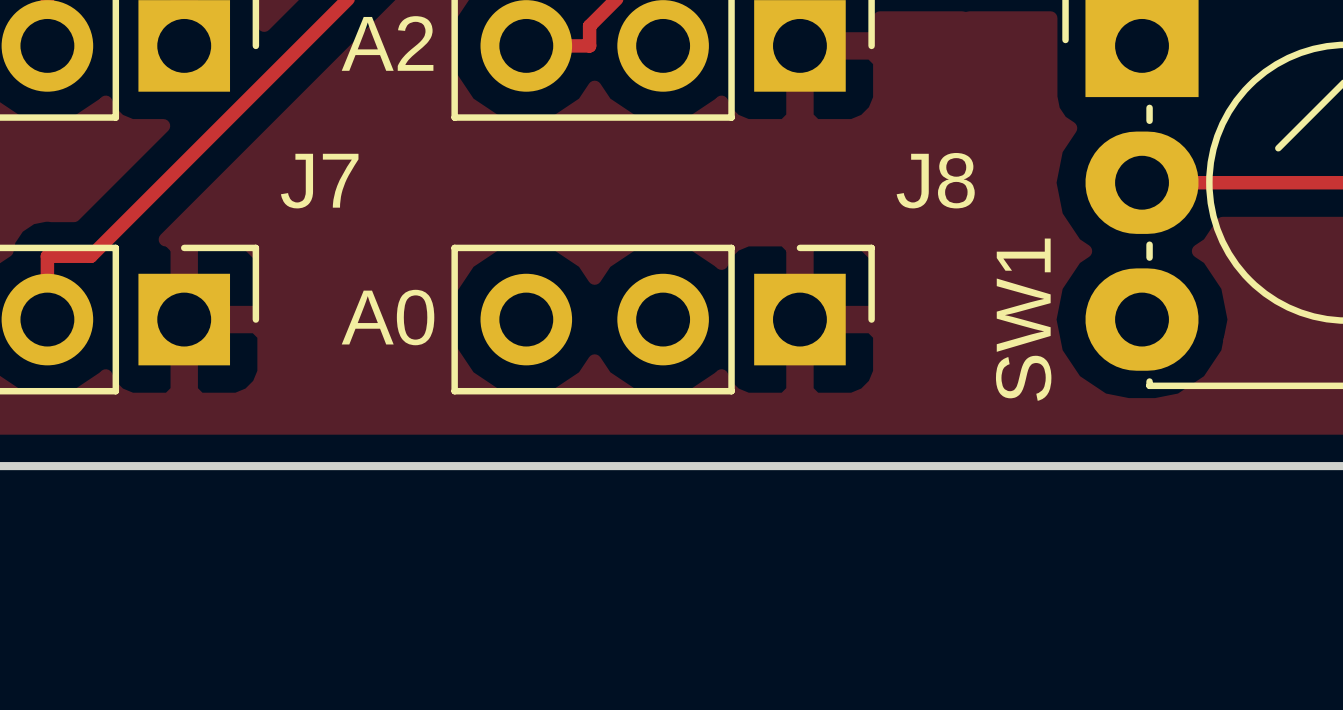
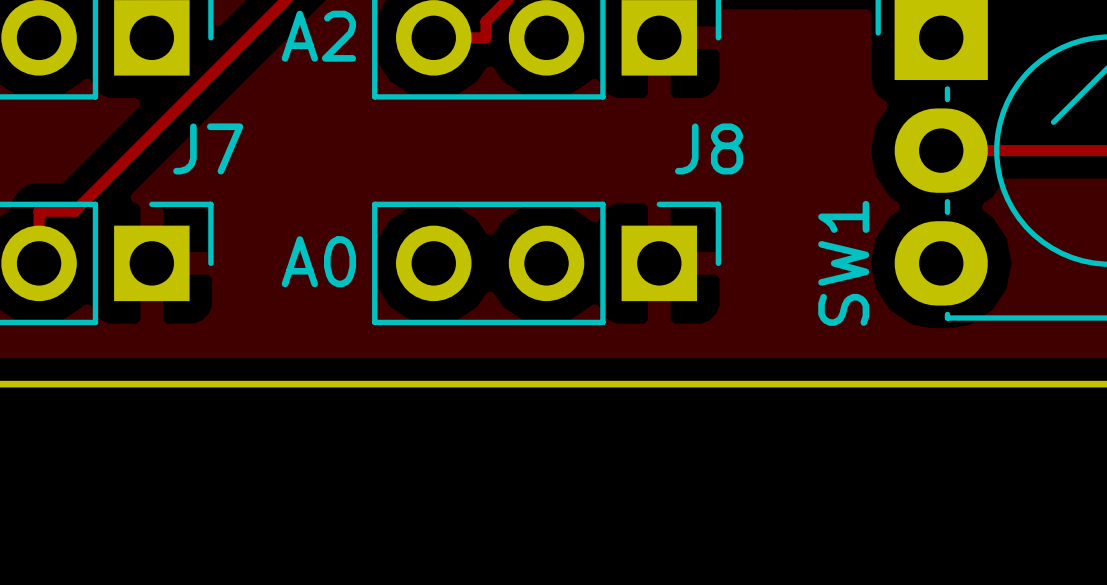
J8 name position: J8 (935, 180) -> J8 (708, 148)
J7 name position: J7 (319, 181) -> J7 (208, 148)

